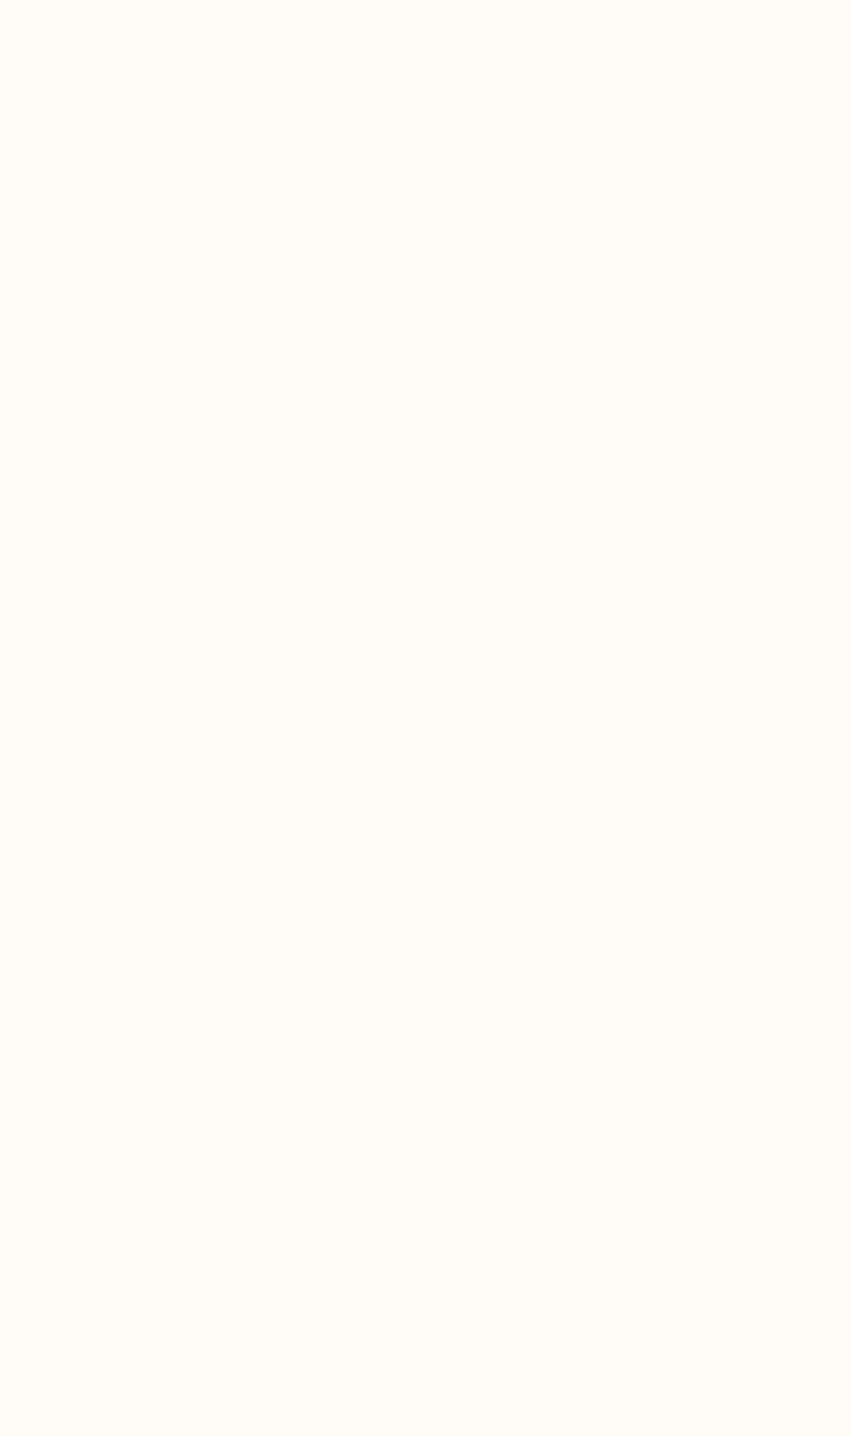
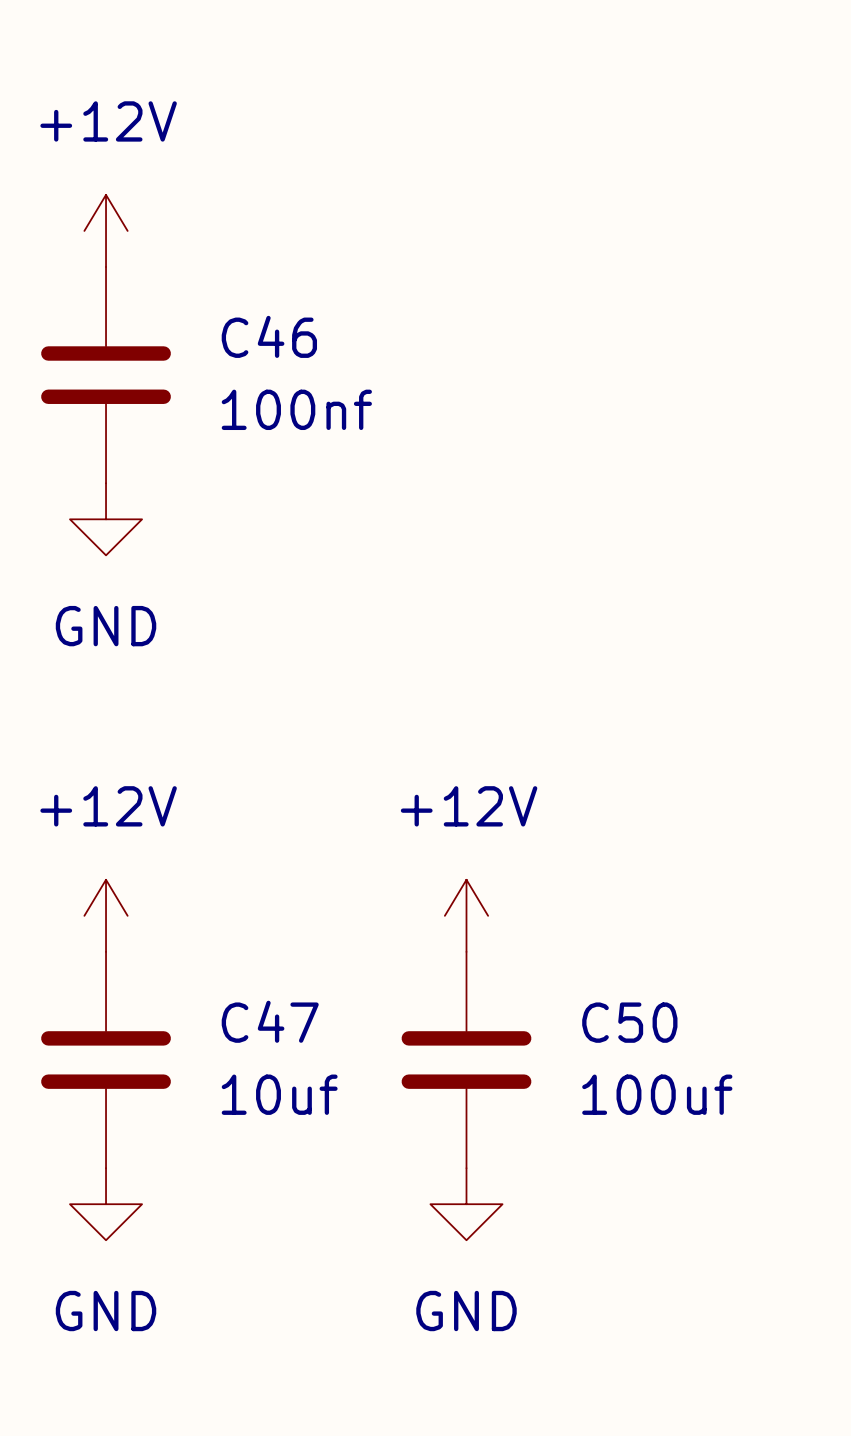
power symbol: none -> +12V (106, 230)
C46: none -> 100nf (106, 375)
power symbol: none -> GND (106, 519)
power symbol: none -> +12V (106, 915)
power symbol: none -> +12V (466, 915)
C47: none -> 10uf (106, 1060)
C50: none -> 100uf (466, 1060)
power symbol: none -> GND (106, 1204)
power symbol: none -> GND (466, 1204)

